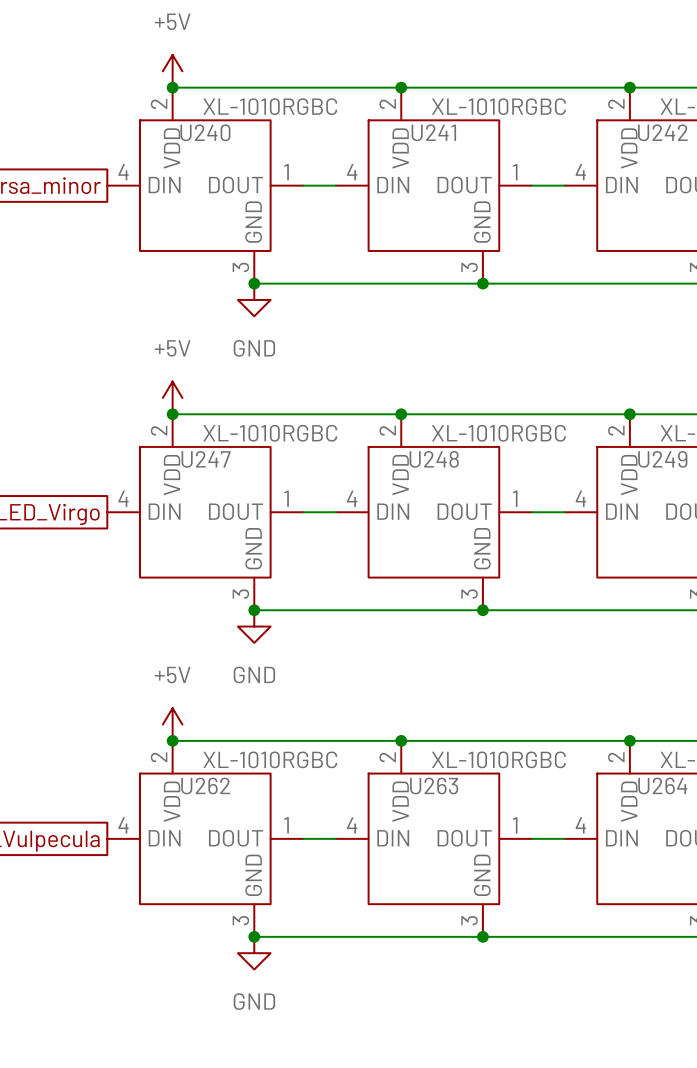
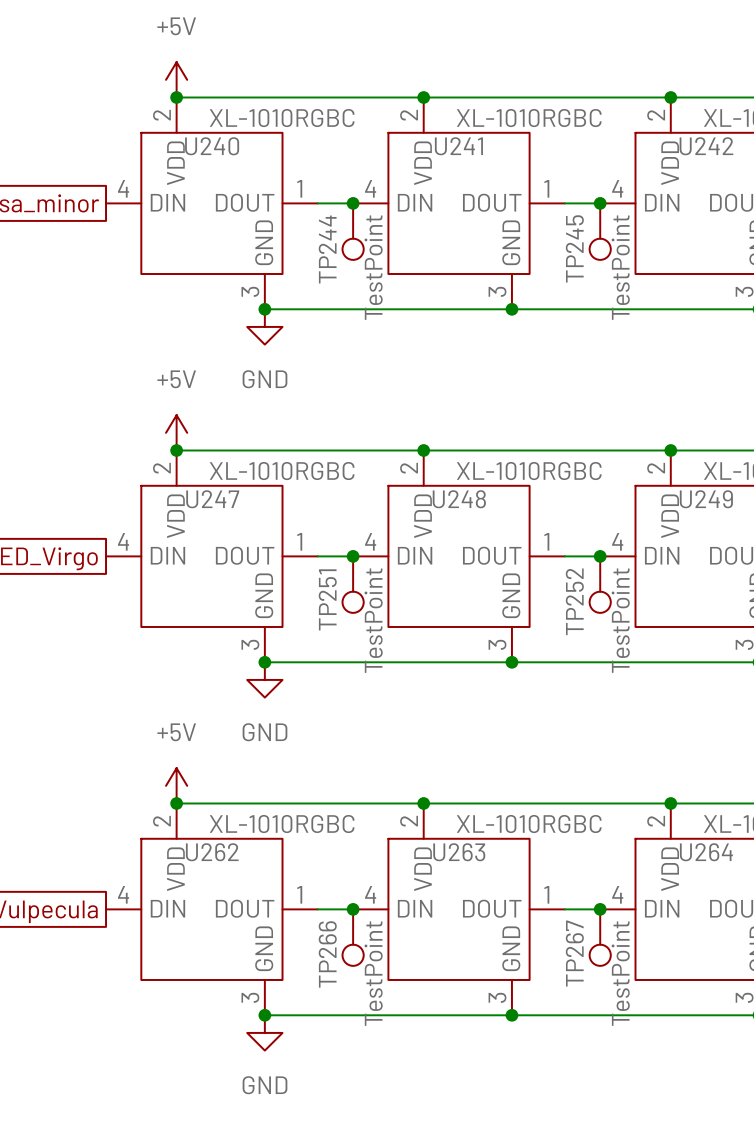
junction: none -> (353, 203)
junction: none -> (600, 203)
TP244: none -> TestPoint (353, 231)
TP245: none -> TestPoint (600, 231)
junction: none -> (353, 556)
junction: none -> (600, 556)
TP251: none -> TestPoint (353, 584)
TP252: none -> TestPoint (600, 584)
junction: none -> (353, 909)
junction: none -> (600, 909)
TP266: none -> TestPoint (353, 937)
TP267: none -> TestPoint (600, 937)

